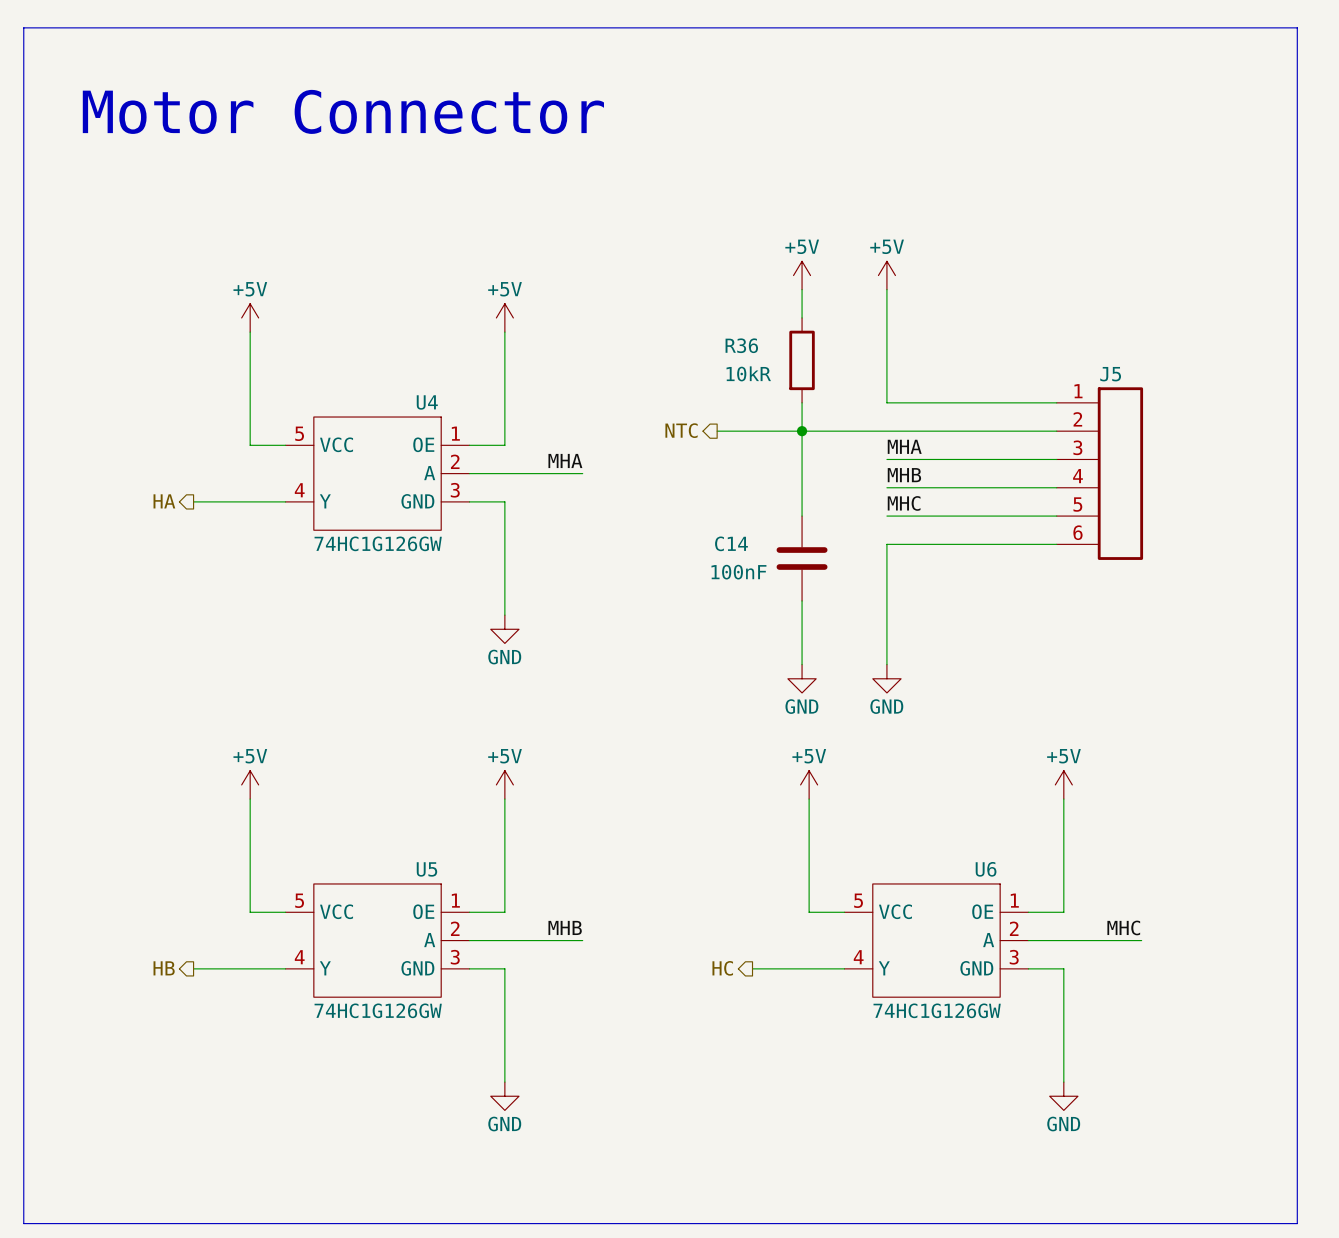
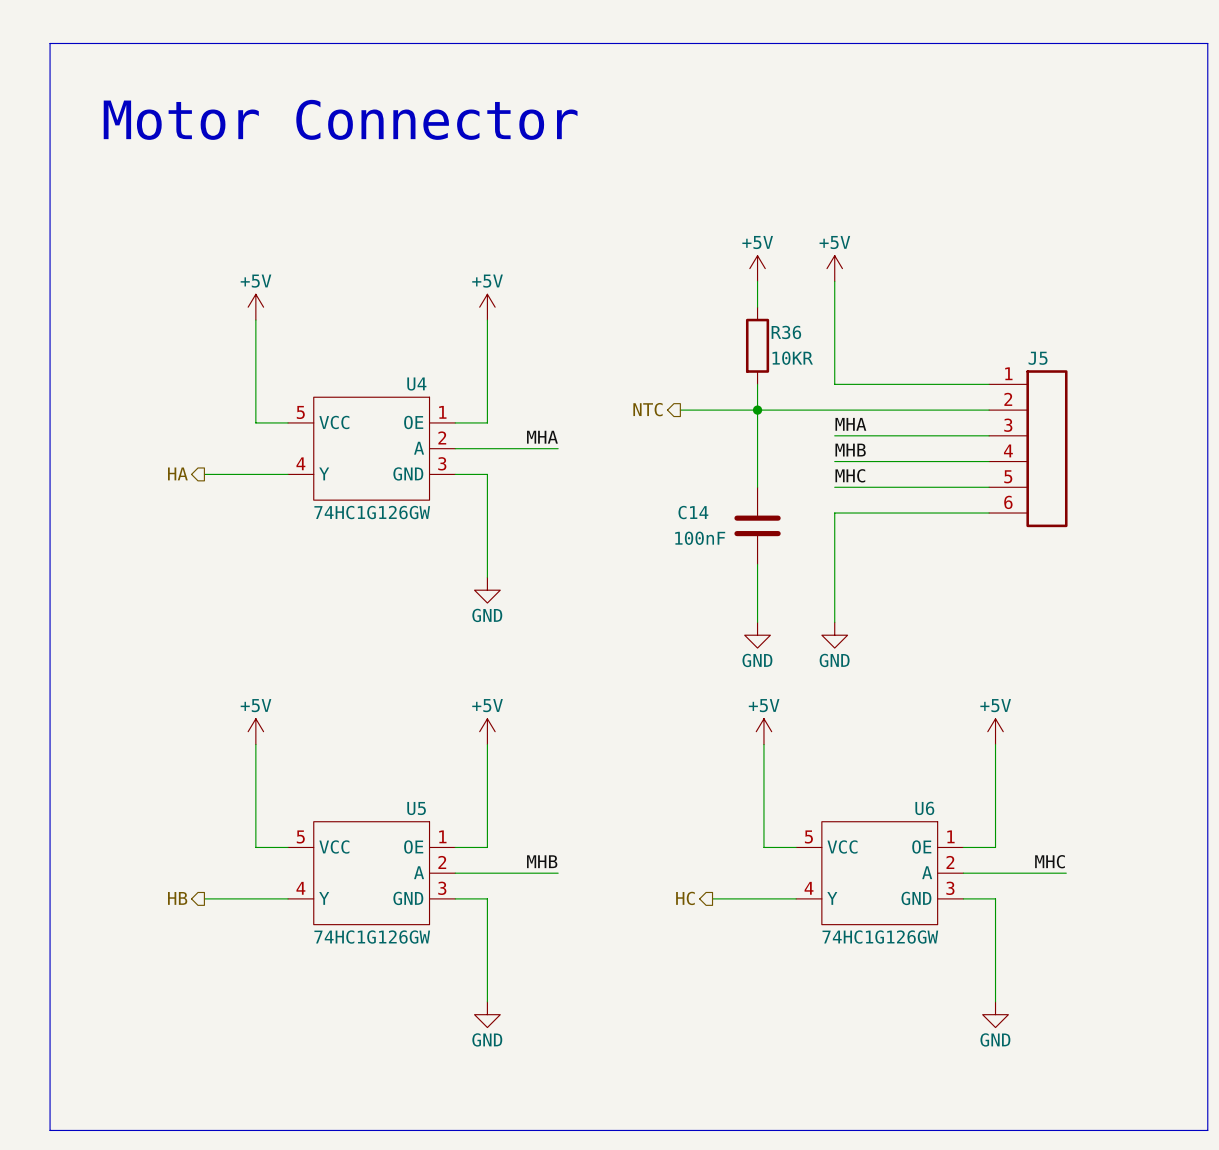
R36 name position: R36 (741, 345) -> R36 (786, 332)
R36 value: 10kR (748, 373) -> 10KR (792, 358)

